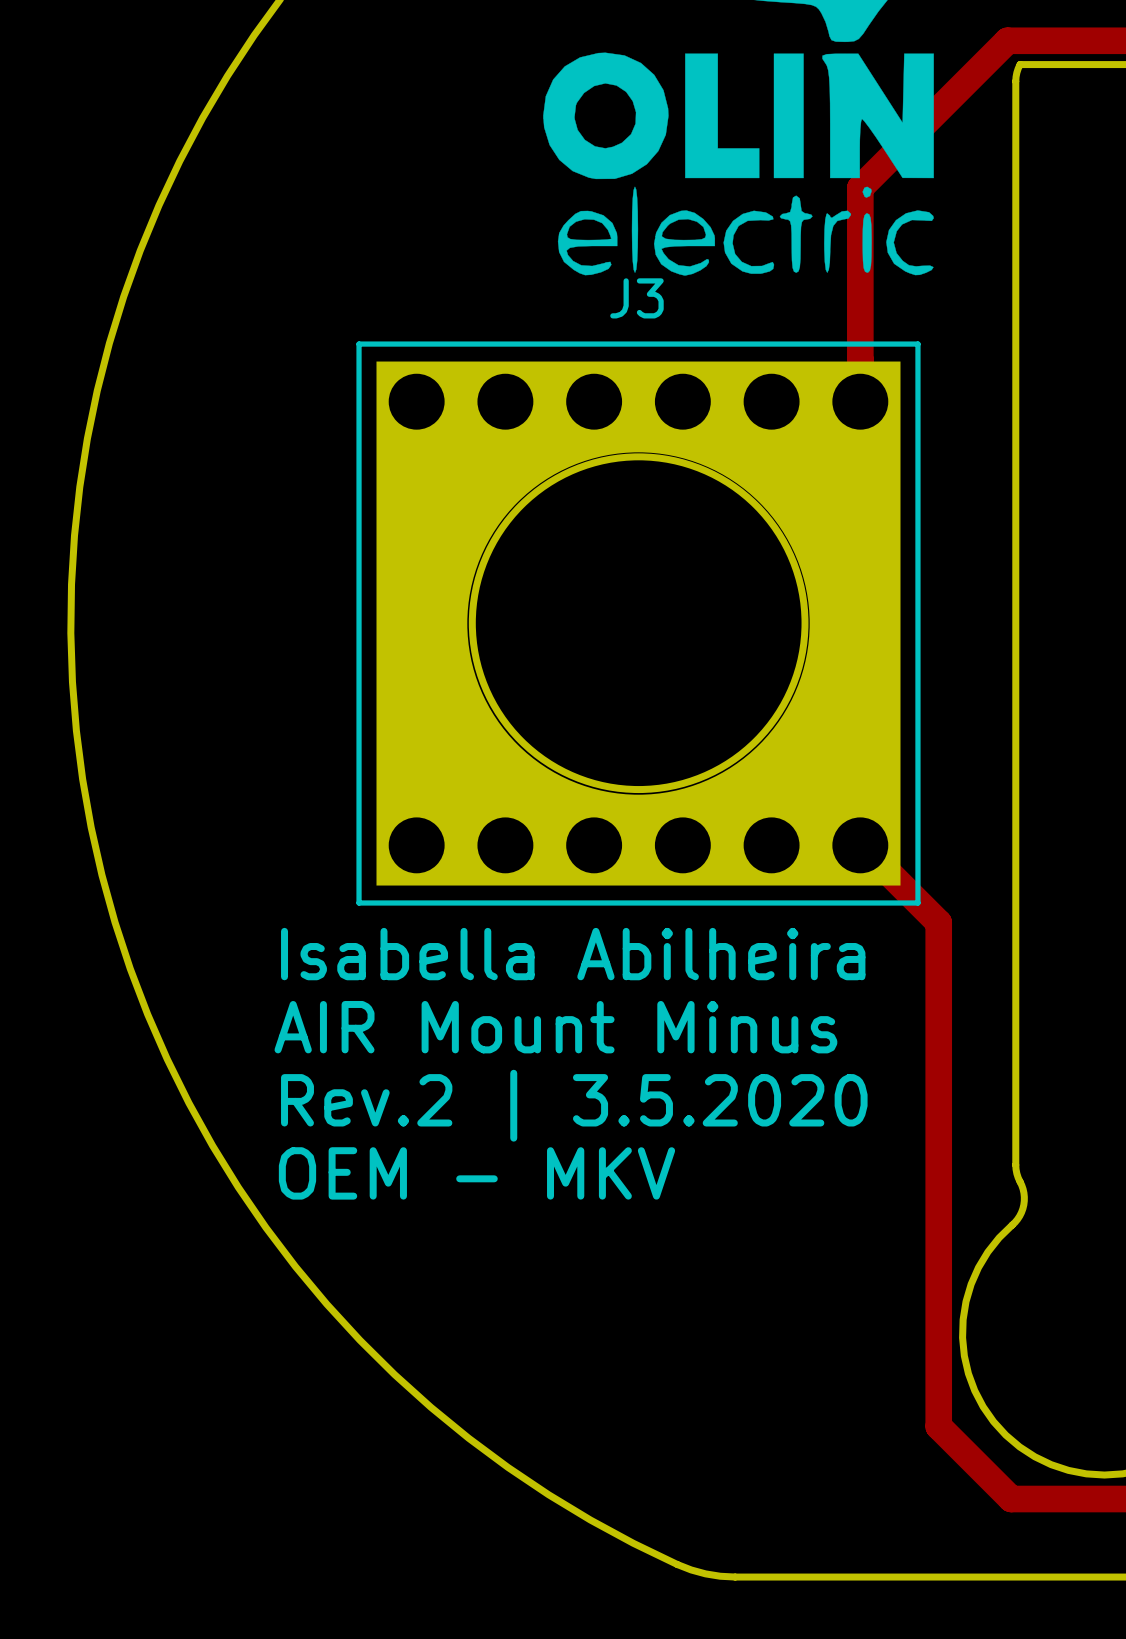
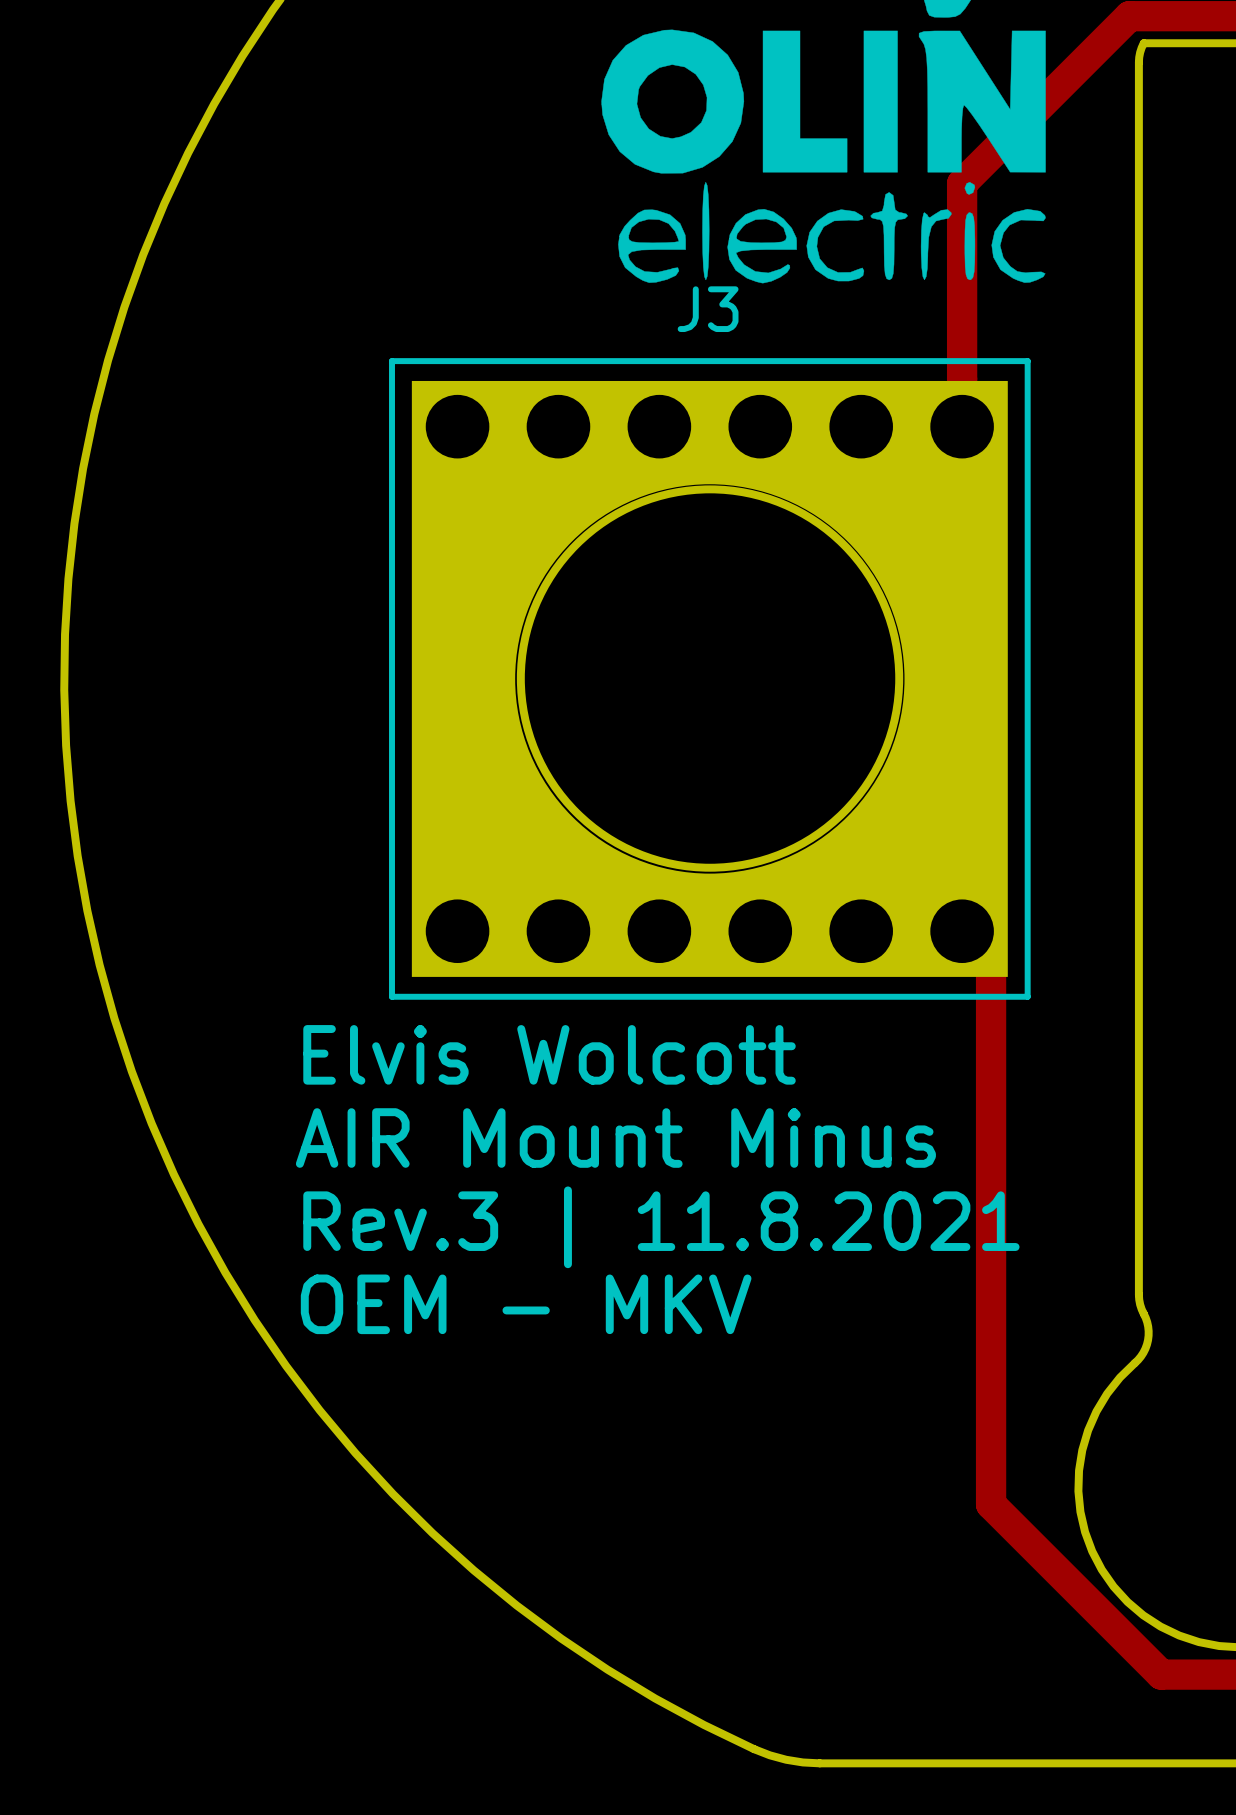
track: (861, 845) (938, 922) (938, 1426) (1011, 1499) (1035, 1499) -> (858, 836) (991, 969) (991, 1504) (1161, 1674)
text: Isabella Abilheira (573, 954) -> Elvis Wolcott (549, 1054)
text: Rev.2 | 3.5.2020 (574, 1105) -> Rev.3 | 11.8.2021 (661, 1227)

